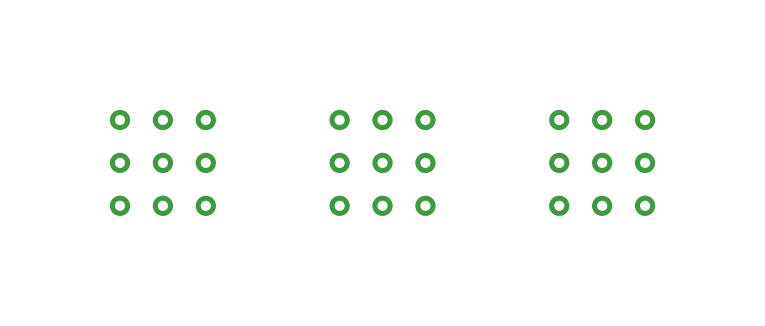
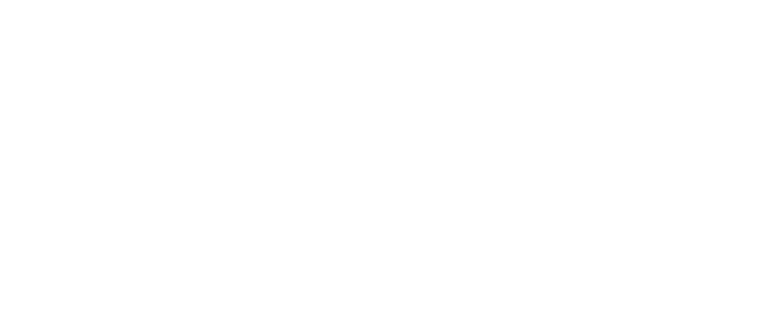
part: (162, 162) -> none
part: (382, 162) -> none
part: (602, 162) -> none

